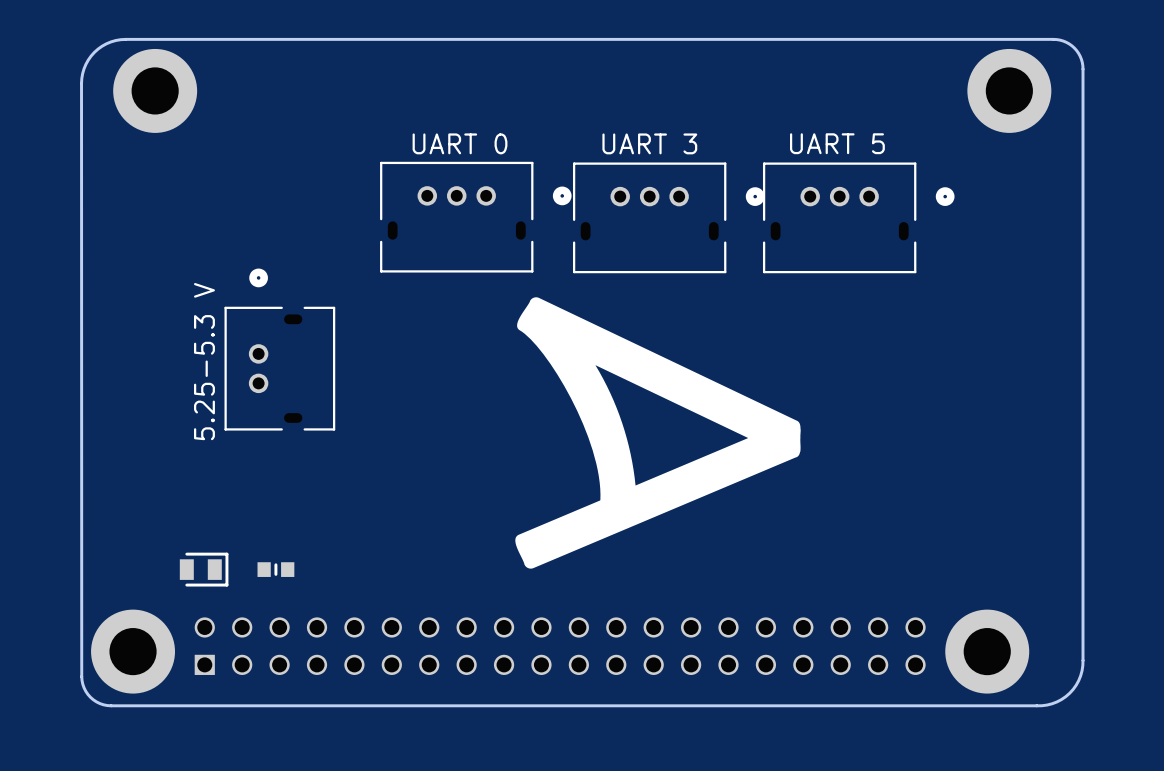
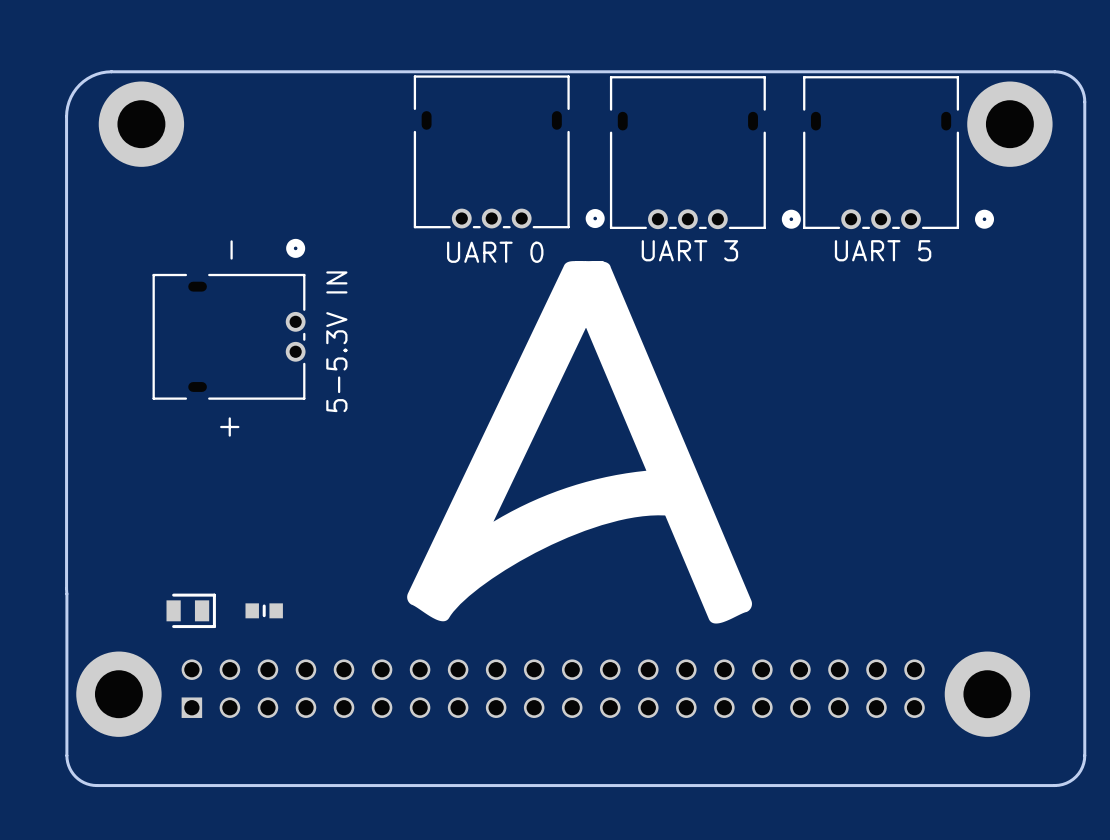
board edge: (81, 83) (81, 676) (85, 691) (96, 701) (111, 705) (1041, 705) (1061, 699) (1073, 689) (1080, 675) (1083, 660) -> (66, 116) (66, 755) (71, 771) (80, 780) (96, 785) (1058, 785) (1069, 781) (1076, 776) (1083, 763) (1084, 703)
part: none -> (509, 151)
part: none -> (705, 152)
part: none -> (898, 152)
part: (475, 217) -> none
part: (668, 217) -> none
part: (858, 217) -> none
drawing: none -> [407, 261, 752, 624]
part: none -> (229, 319)
drawing: [515, 297, 801, 569] -> none
part: (279, 349) -> none

